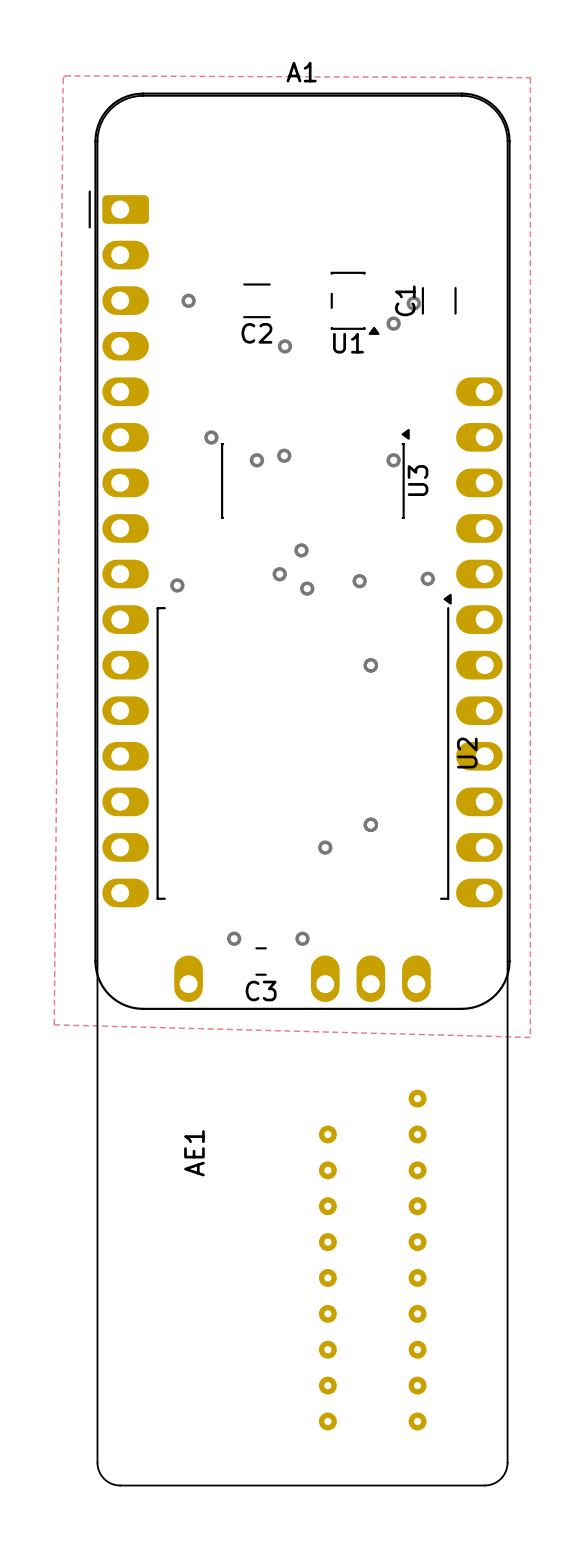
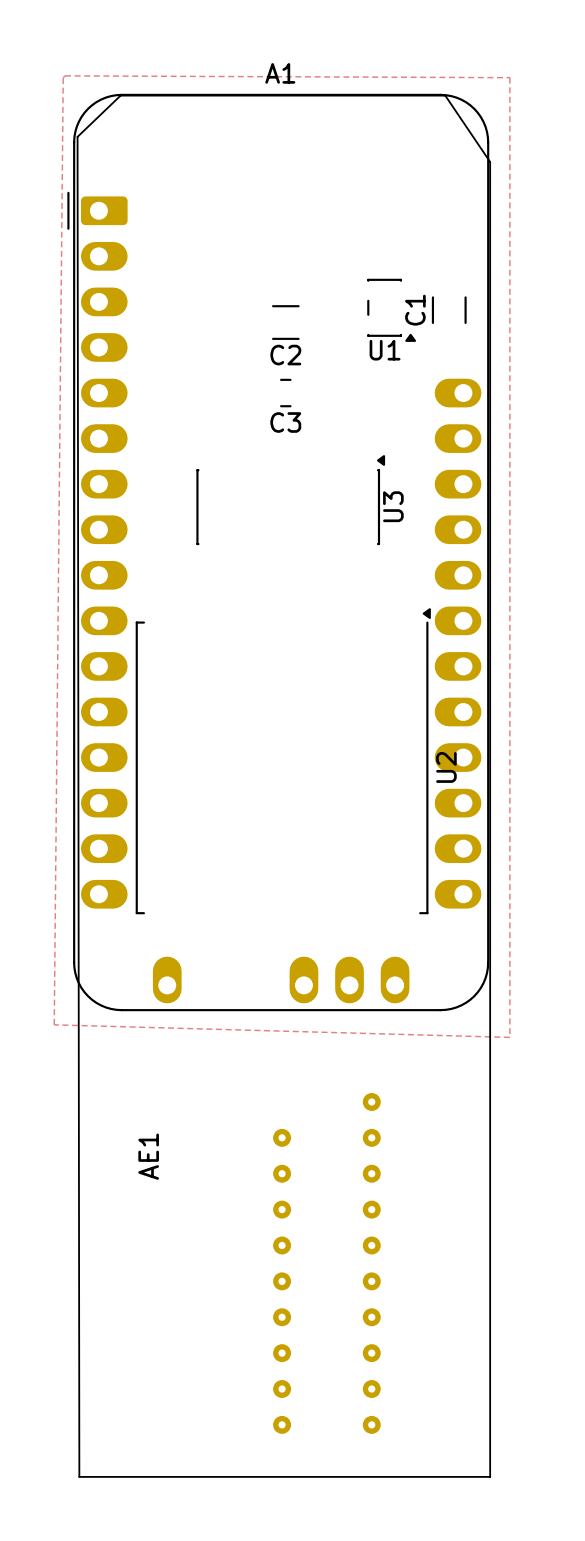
zone outline: (65, 75) (530, 77) (530, 1037) (54, 1024) -> (65, 75) (509, 77) (509, 1037) (54, 1024)
board edge: (143, 95) (467, 96) (479, 99) (494, 109) (501, 118) (506, 129) (507, 141) (507, 1462) (502, 1476) (489, 1484) (120, 1485) (106, 1480) (98, 1467) (97, 141) (100, 123) (110, 109) (125, 99) (143, 95) -> (120, 95) (77, 136) (79, 1476) (490, 1476) (490, 161) (445, 95) (120, 95)
via: (188, 300) -> none
C2 position: (256, 300) -> (285, 322)
C1 position: (439, 300) -> (449, 310)
U1 position: (355, 303) -> (391, 310)
via: (413, 303) -> none
via: (393, 323) -> none
via: (284, 346) -> none
via: (211, 437) -> none
via: (284, 455) -> none
via: (256, 460) -> none
via: (393, 460) -> none
U3 position: (315, 473) -> (290, 500)
via: (301, 550) -> none
A1 position: (299, 551) -> (278, 552)
via: (279, 574) -> none
via: (427, 578) -> none
via: (359, 581) -> none
via: (177, 585) -> none
via: (307, 588) -> none
via: (370, 665) -> none
U2 position: (304, 746) -> (283, 761)
via: (370, 824) -> none
via: (325, 847) -> none
via: (234, 938) -> none
via: (302, 938) -> none
C3 position: (261, 961) -> (285, 393)
AE1 position: (372, 1260) -> (326, 1263)

